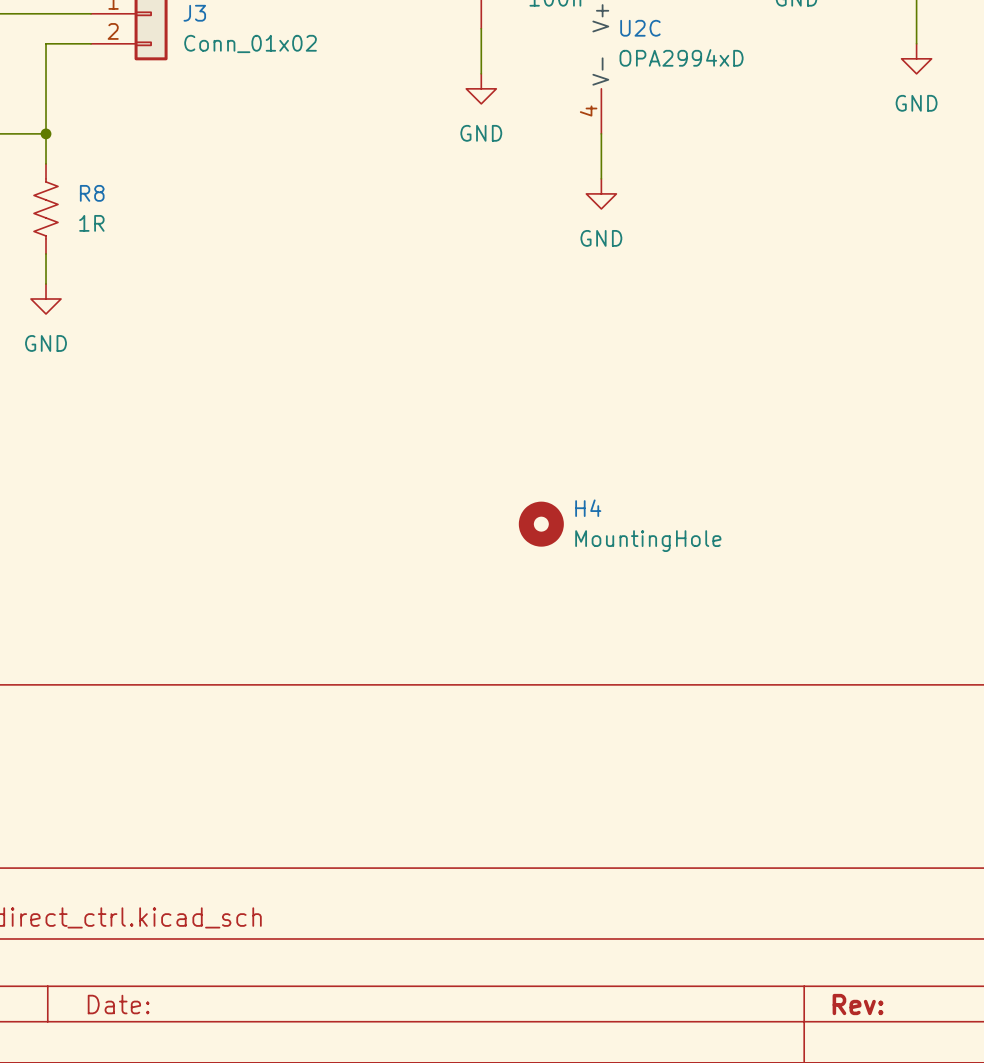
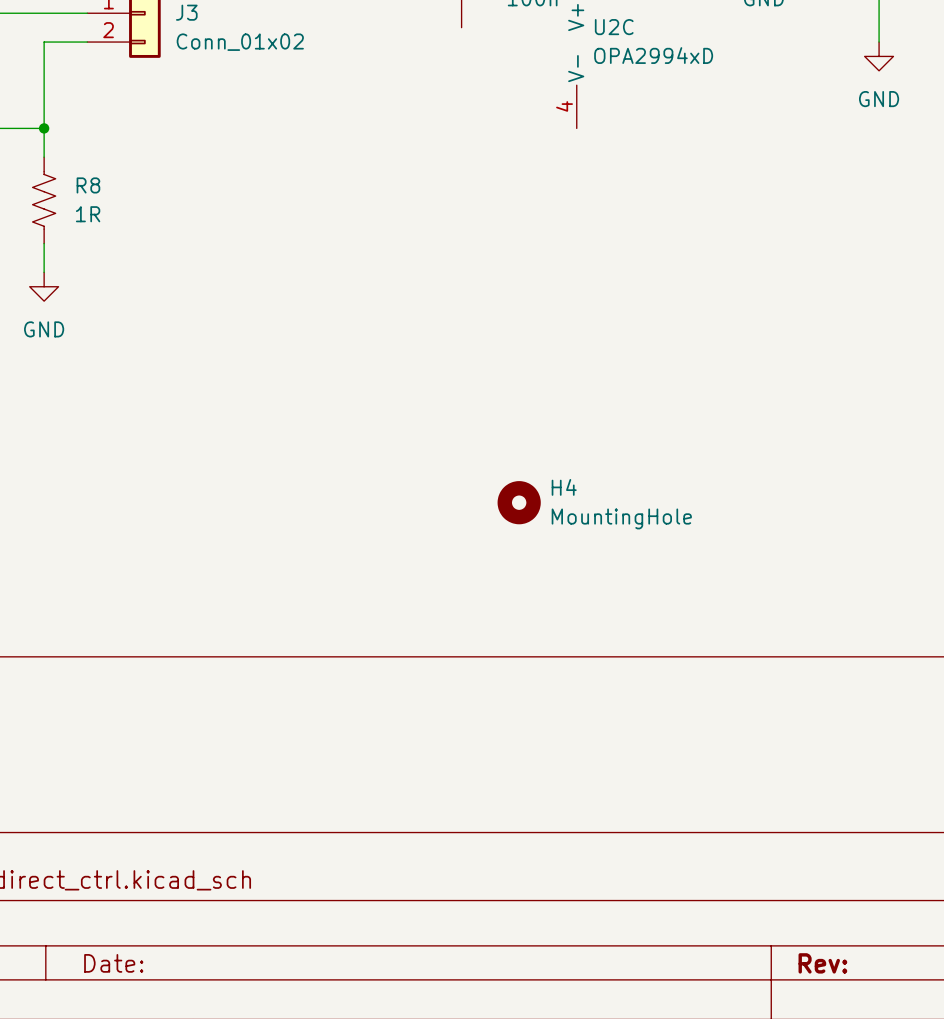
wire: (481, 28) (481, 73) -> none
power symbol: GND (481, 88) -> none
wire: (601, 133) (601, 178) -> none
power symbol: GND (601, 193) -> none

